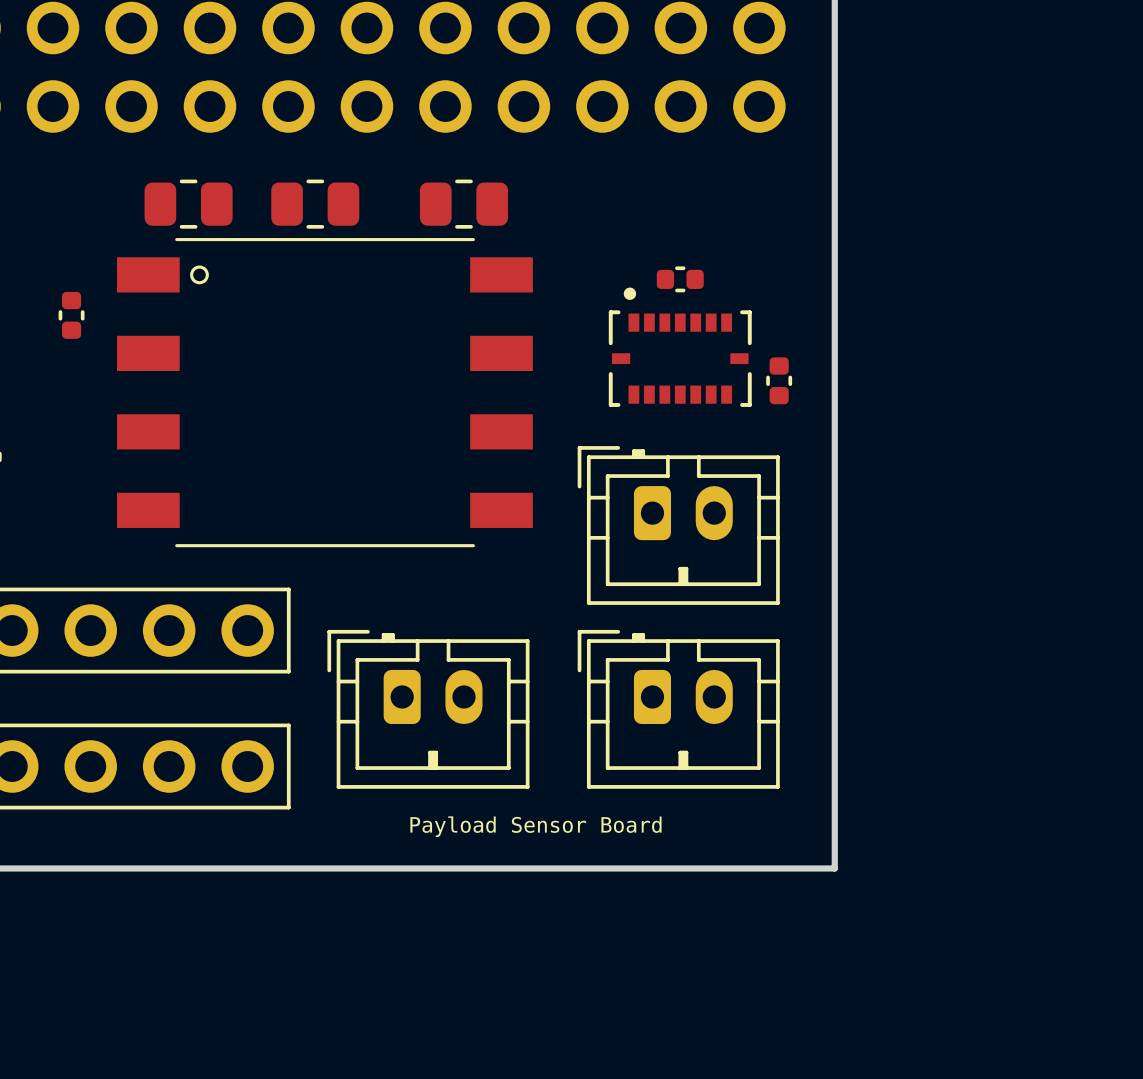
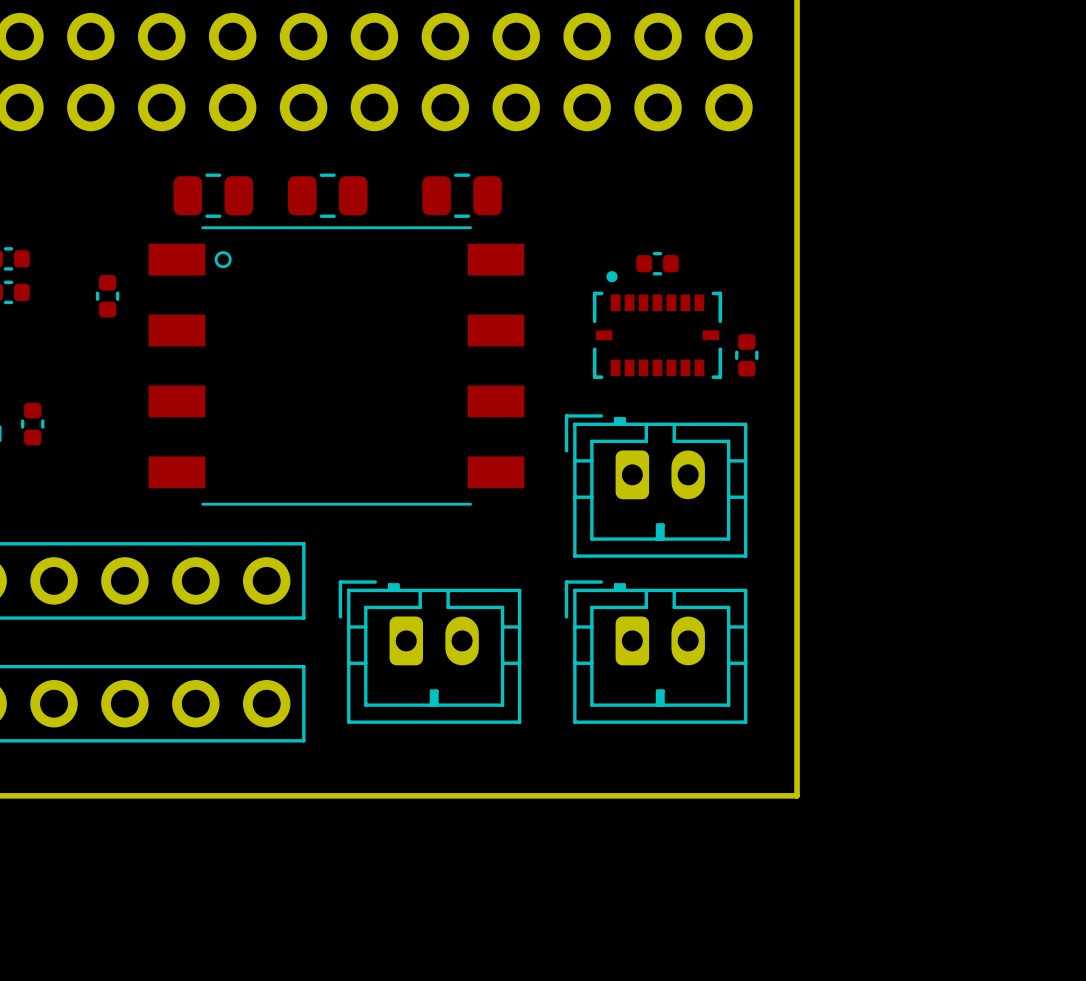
text: Payload Sensor Board (535, 826) -> none

